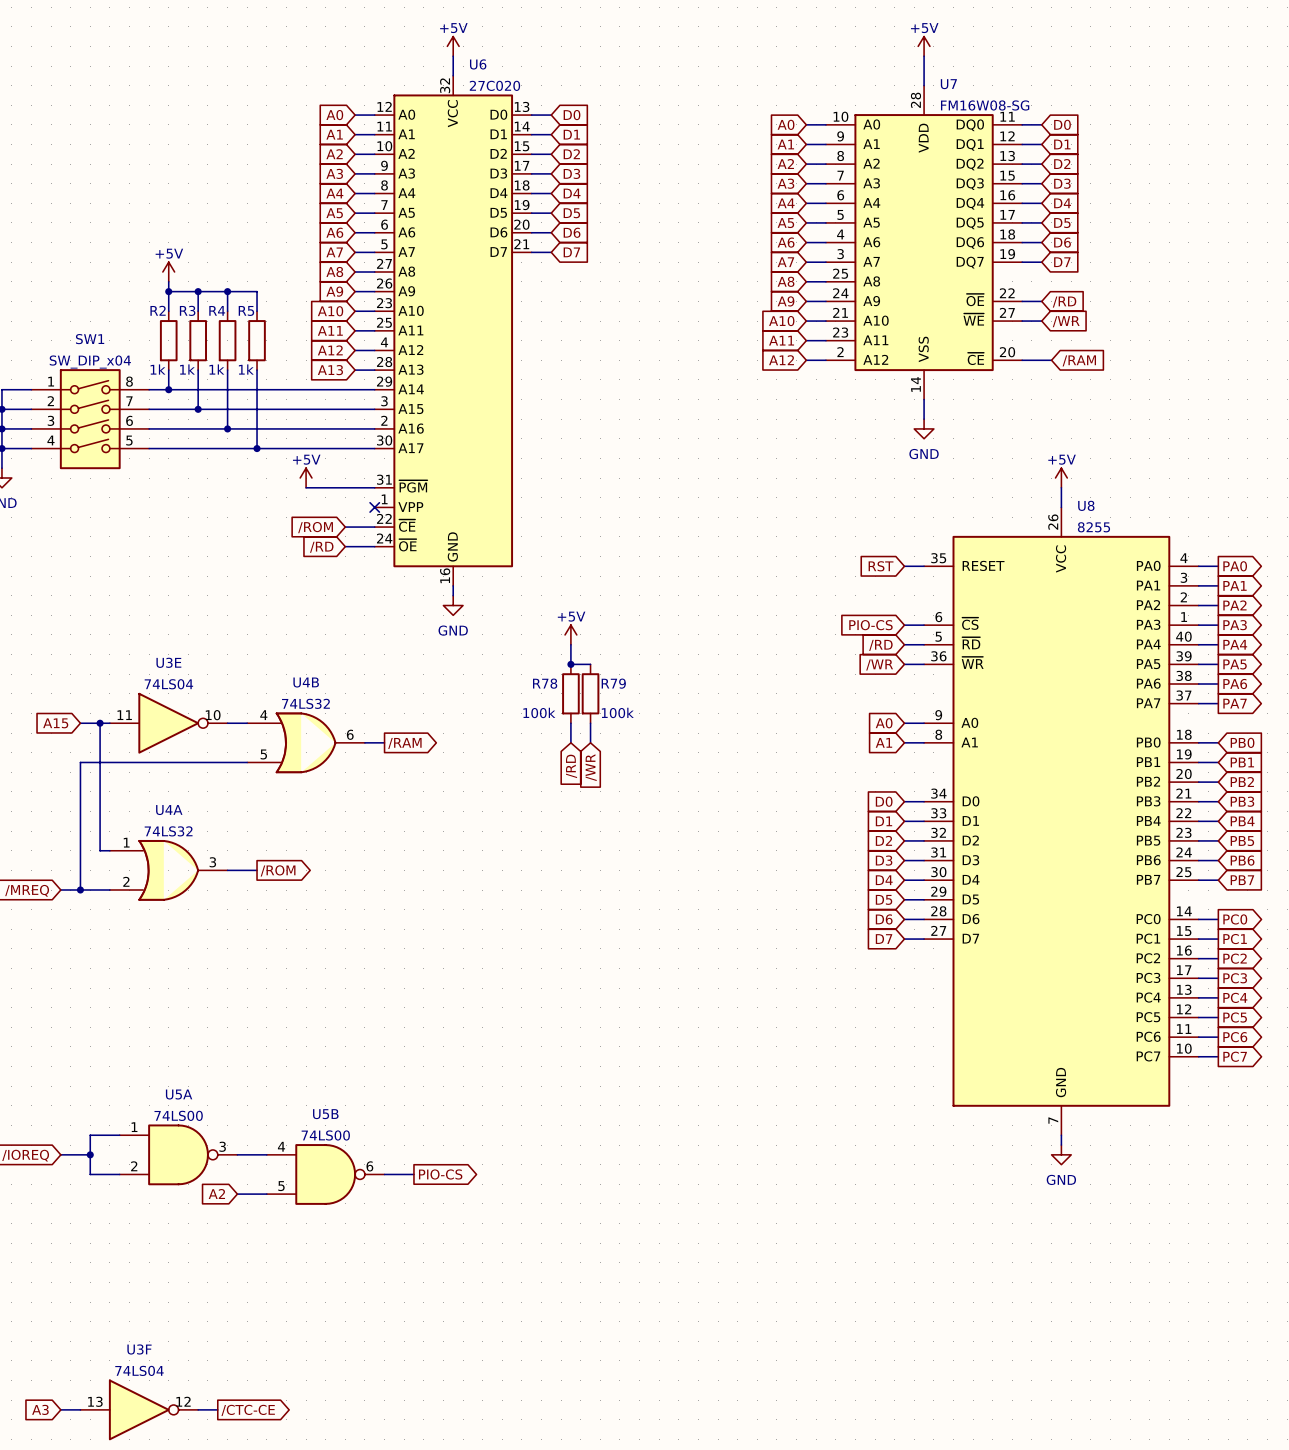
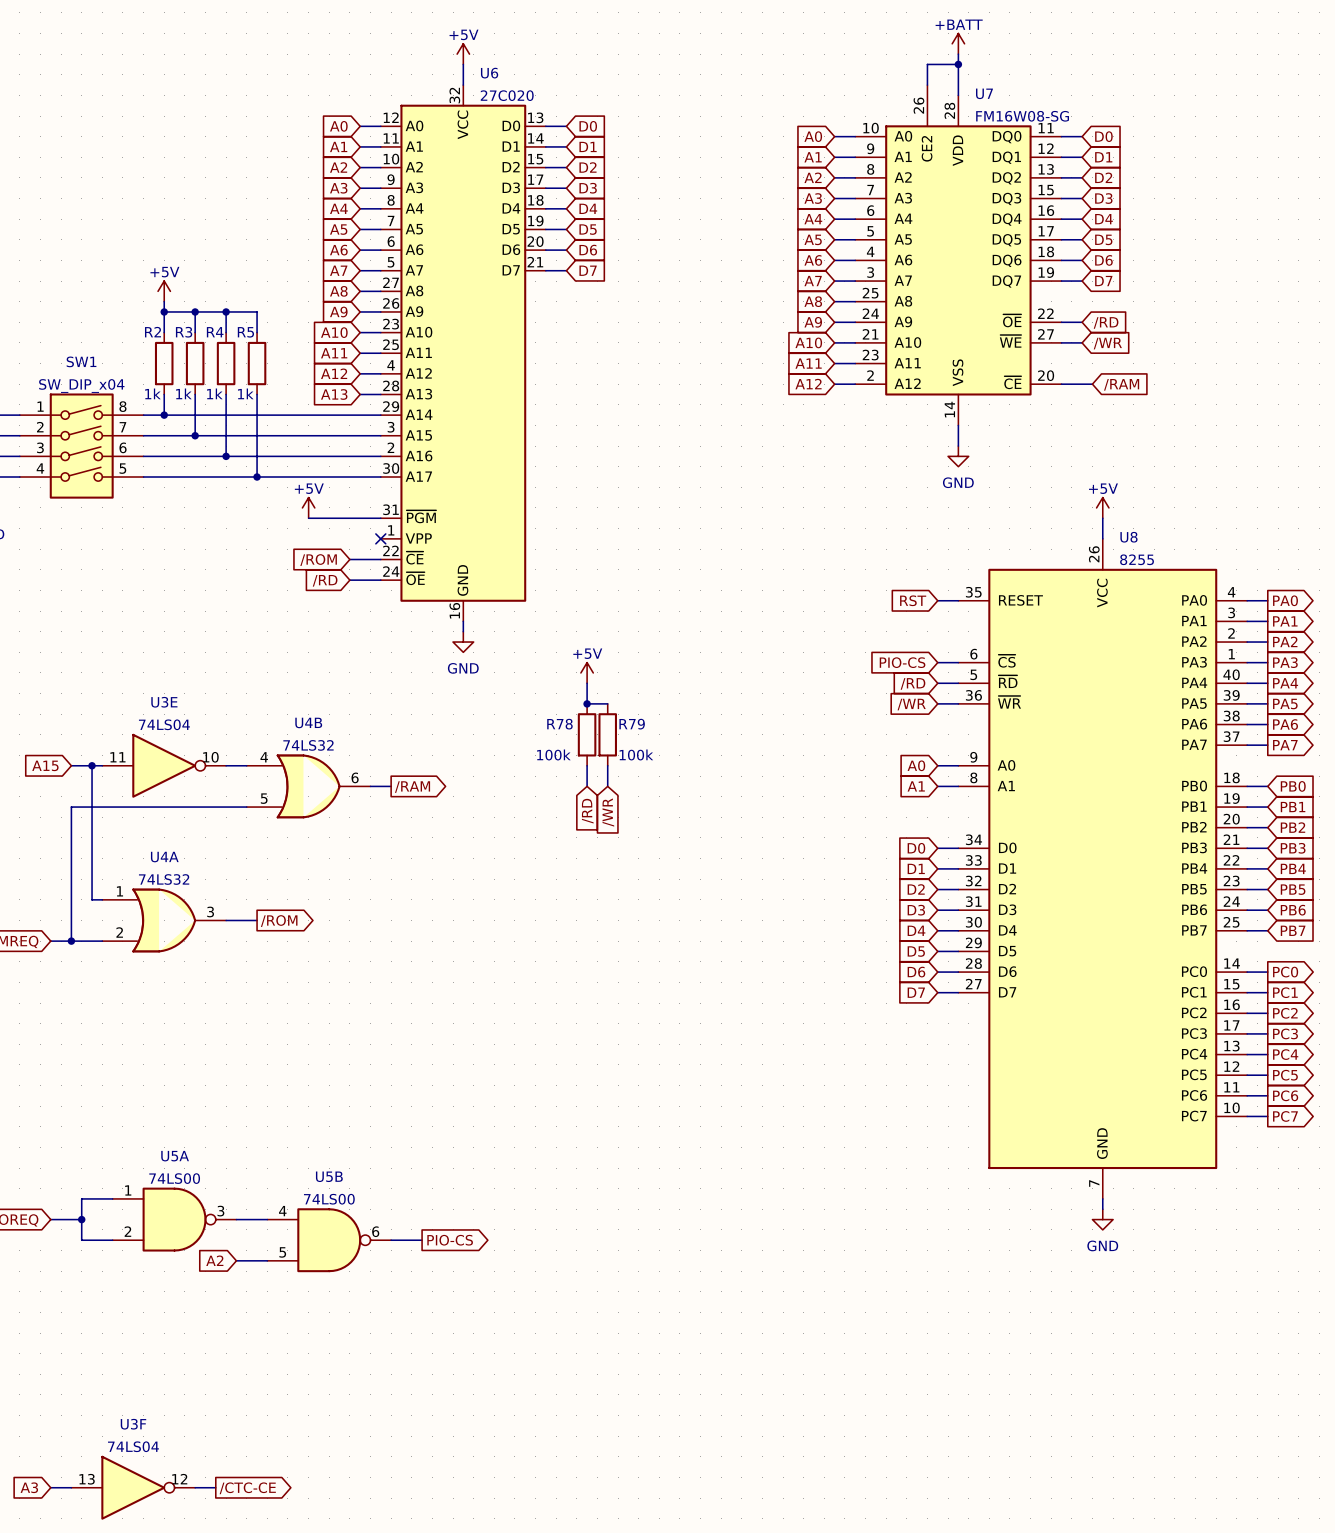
power symbol: none -> +BATT (958, 43)
wire: none -> (958, 54) (958, 64) (927, 64) (927, 85)
power symbol: +5V (924, 46) -> none
junction: none -> (958, 64)
U7 symbol: [825, 85, 1023, 400] -> [855, 85, 1062, 426]

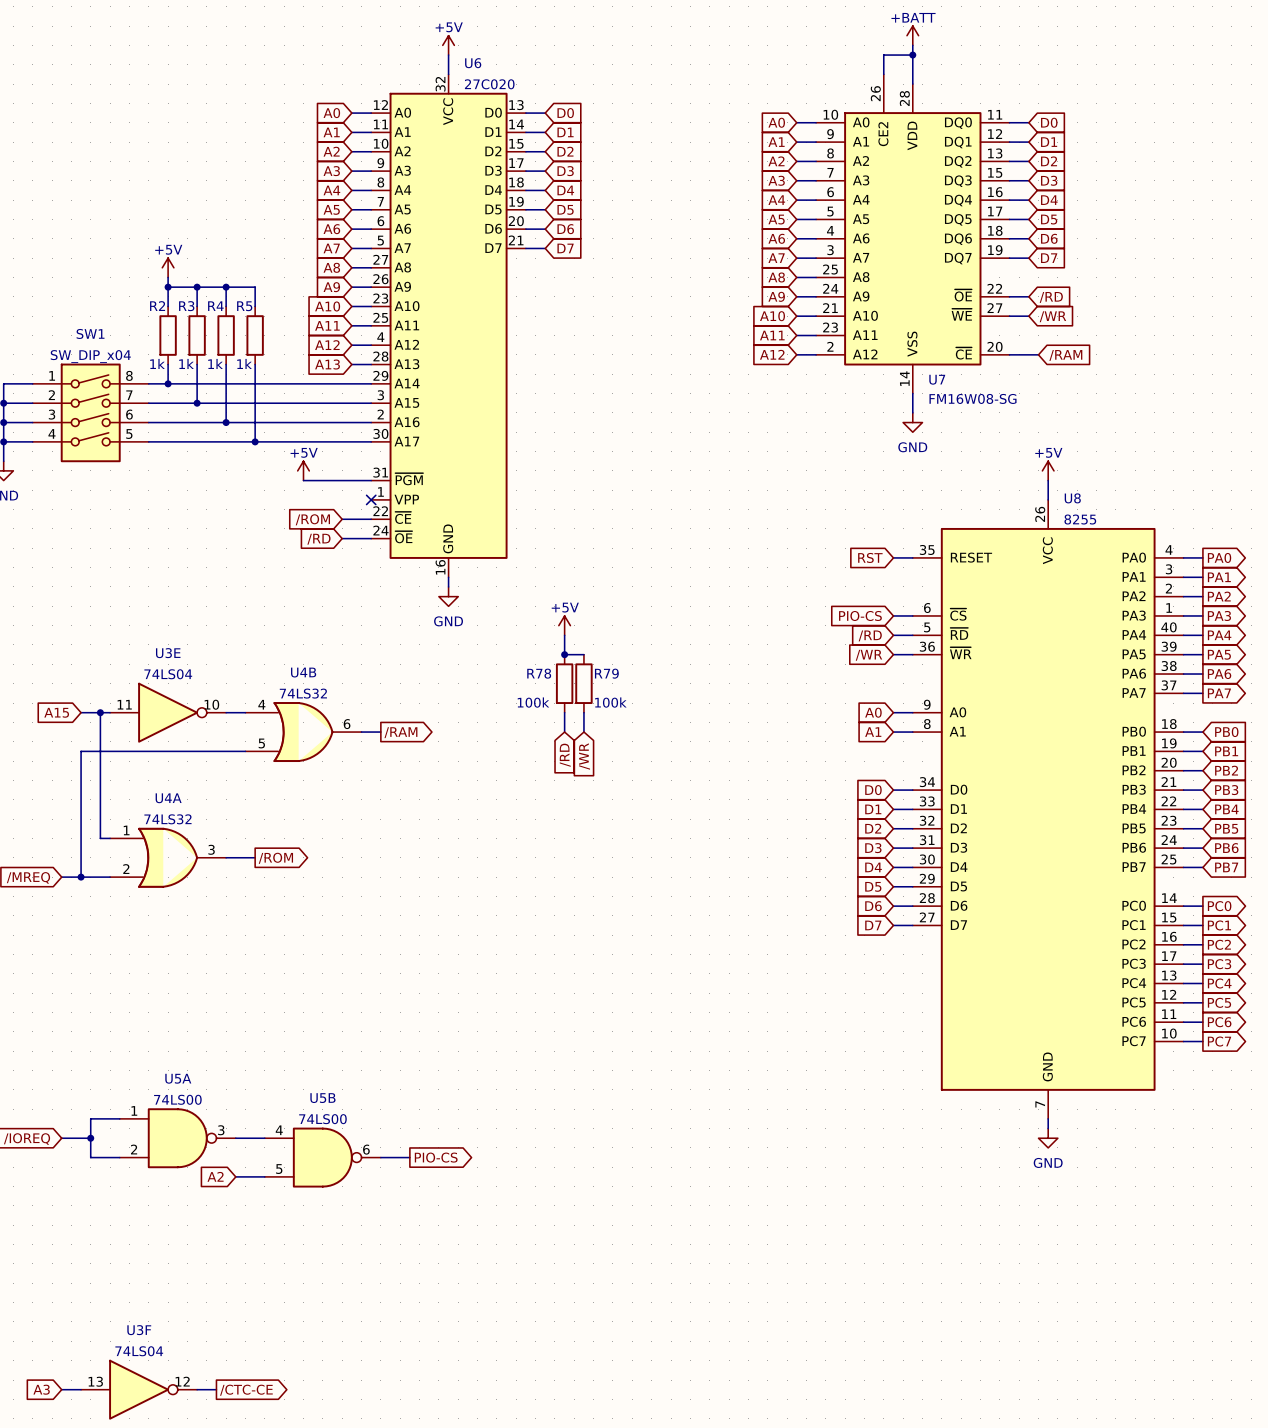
U7 name position: U7 (984, 93) -> U7 (937, 379)
U7 value position: FM16W08-SG (1022, 116) -> FM16W08-SG (972, 398)

